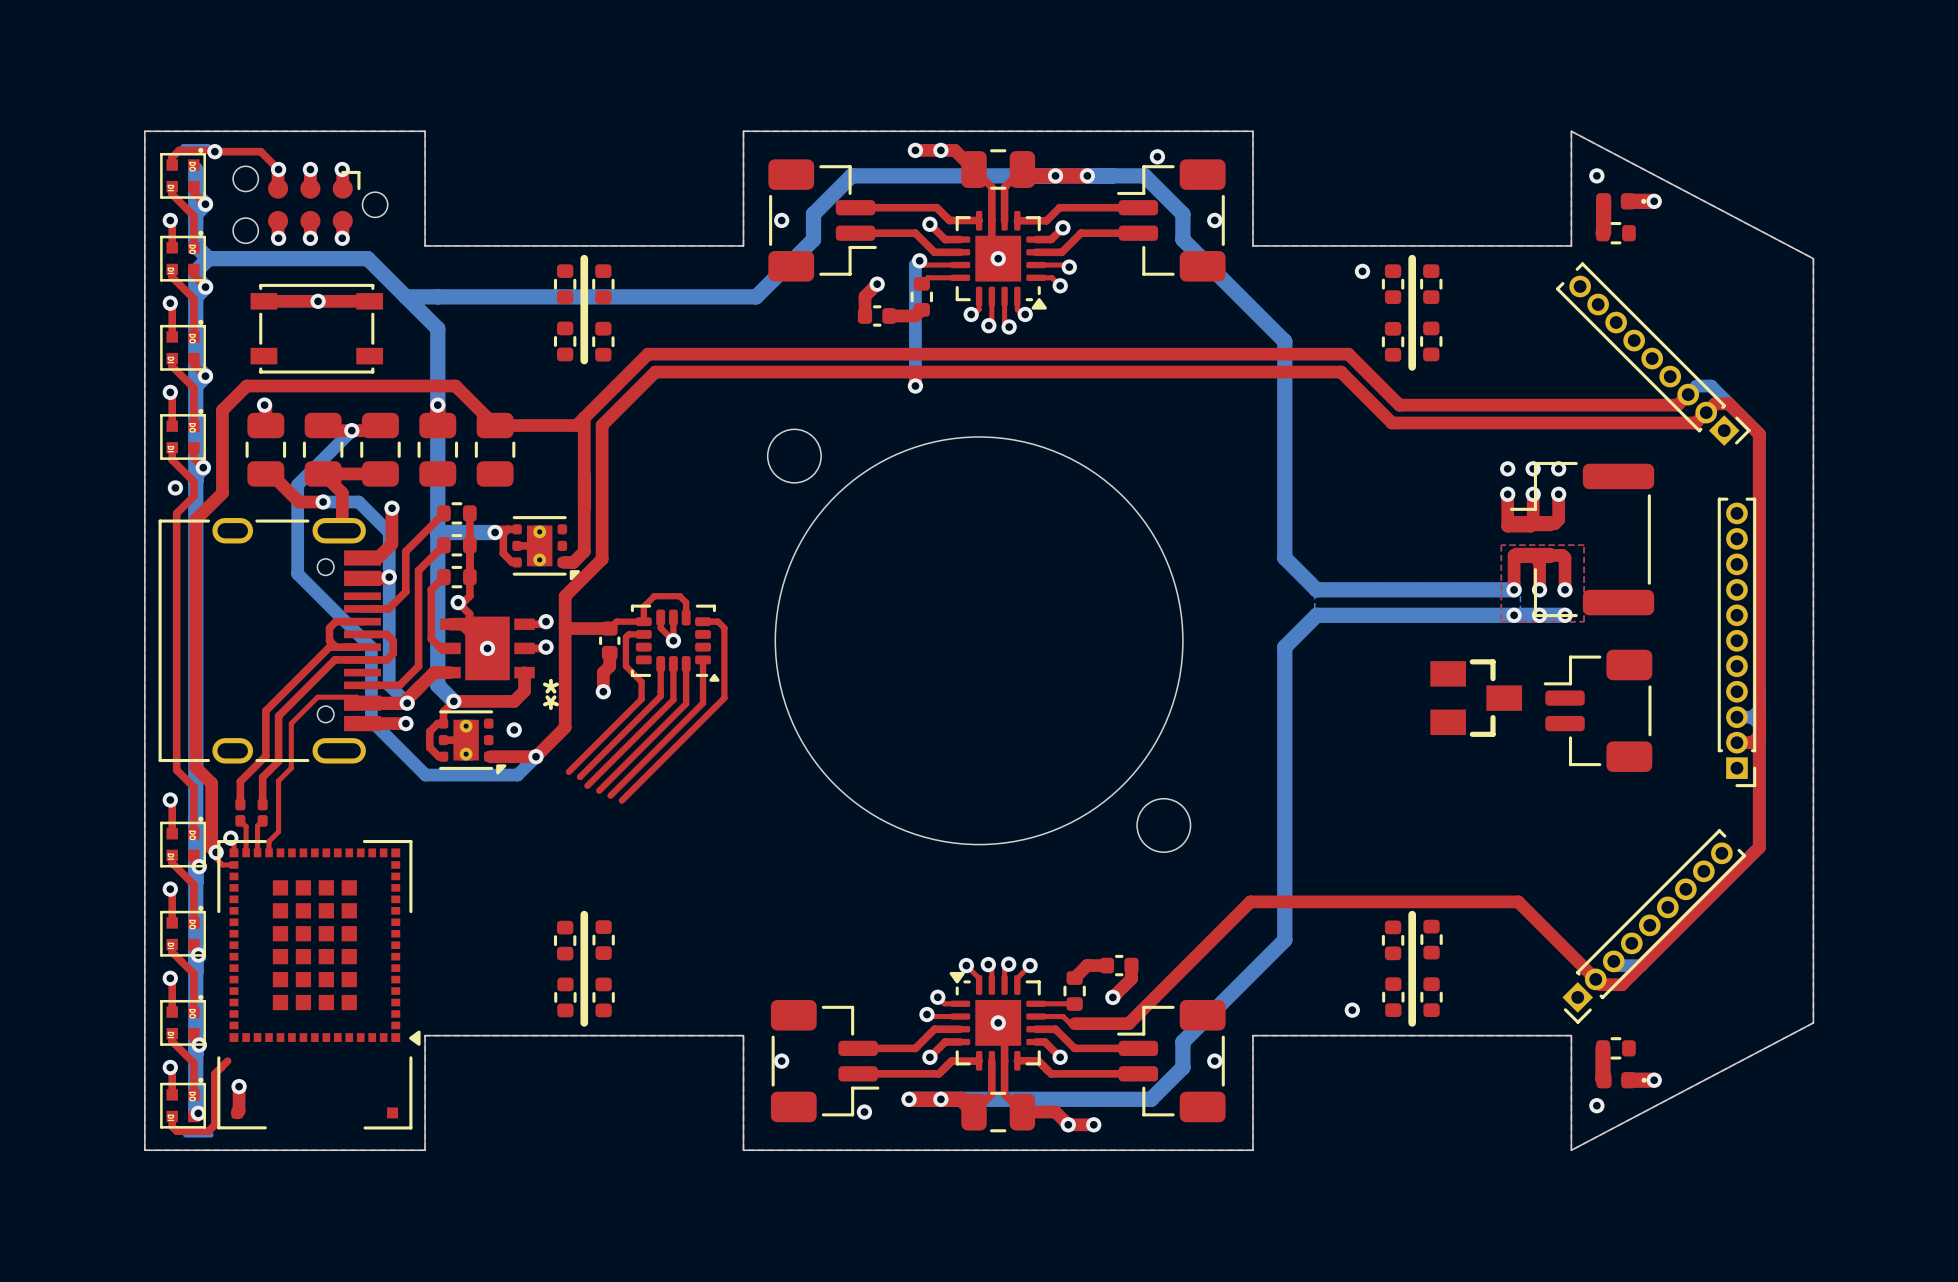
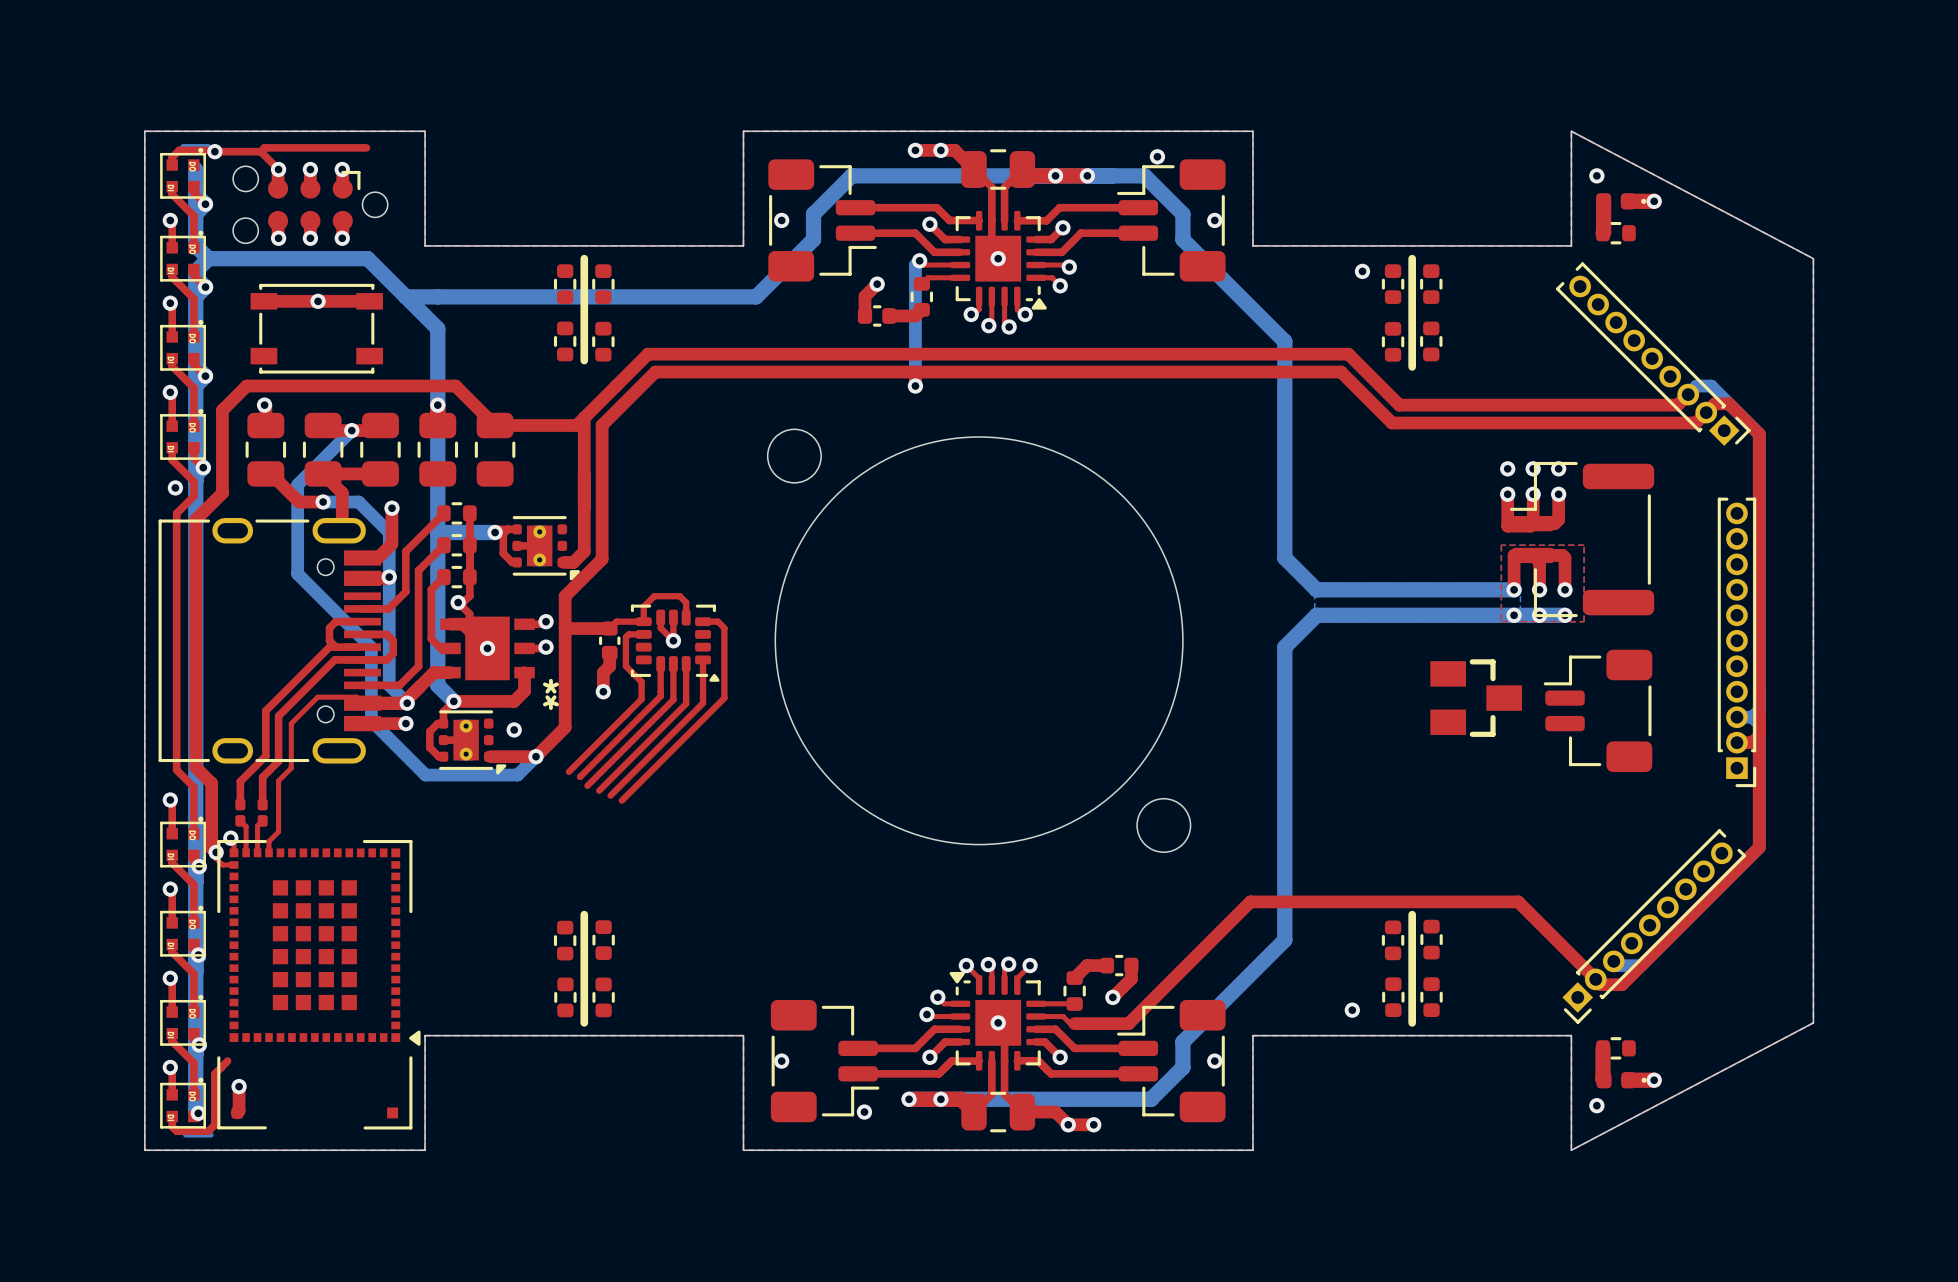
top track: none -> (366, 147) (264, 147) (260, 151)

